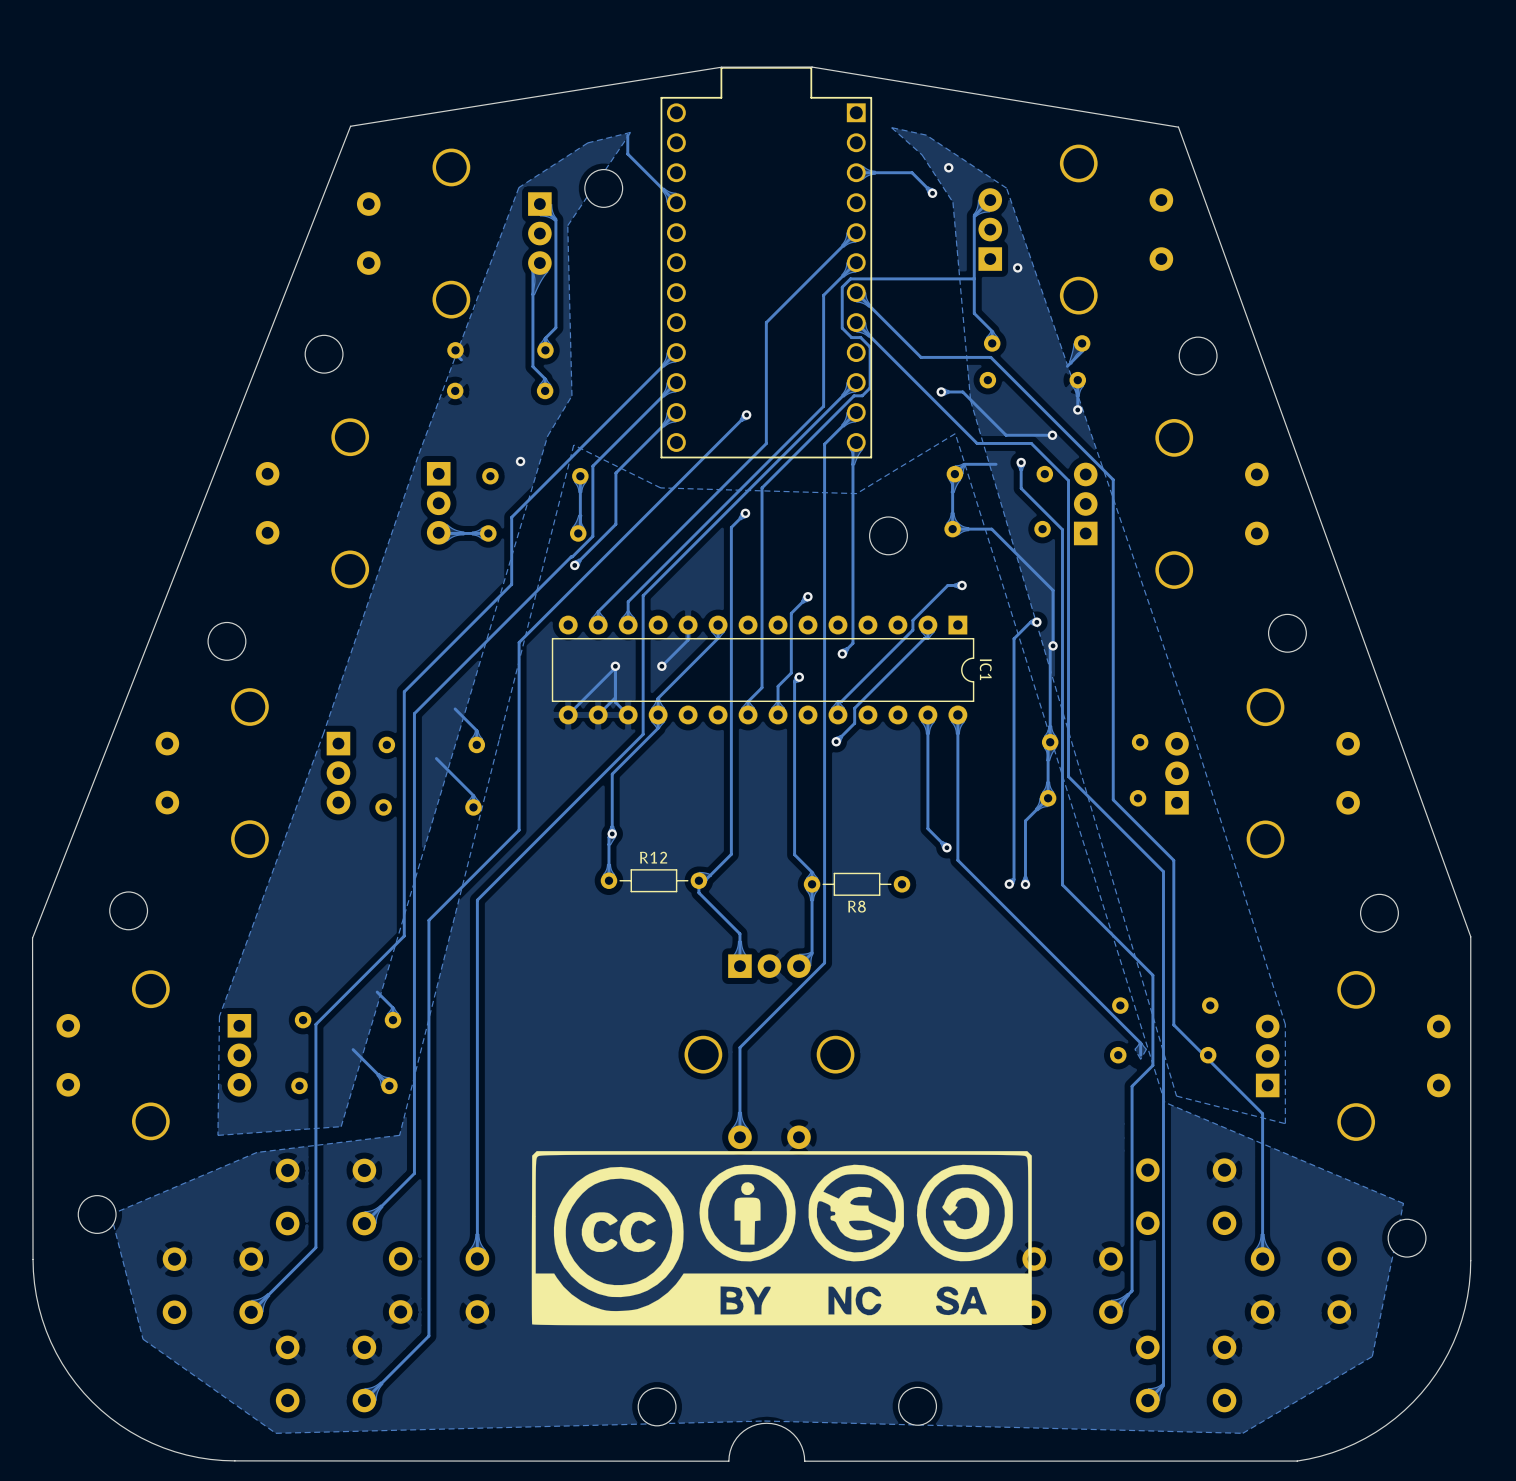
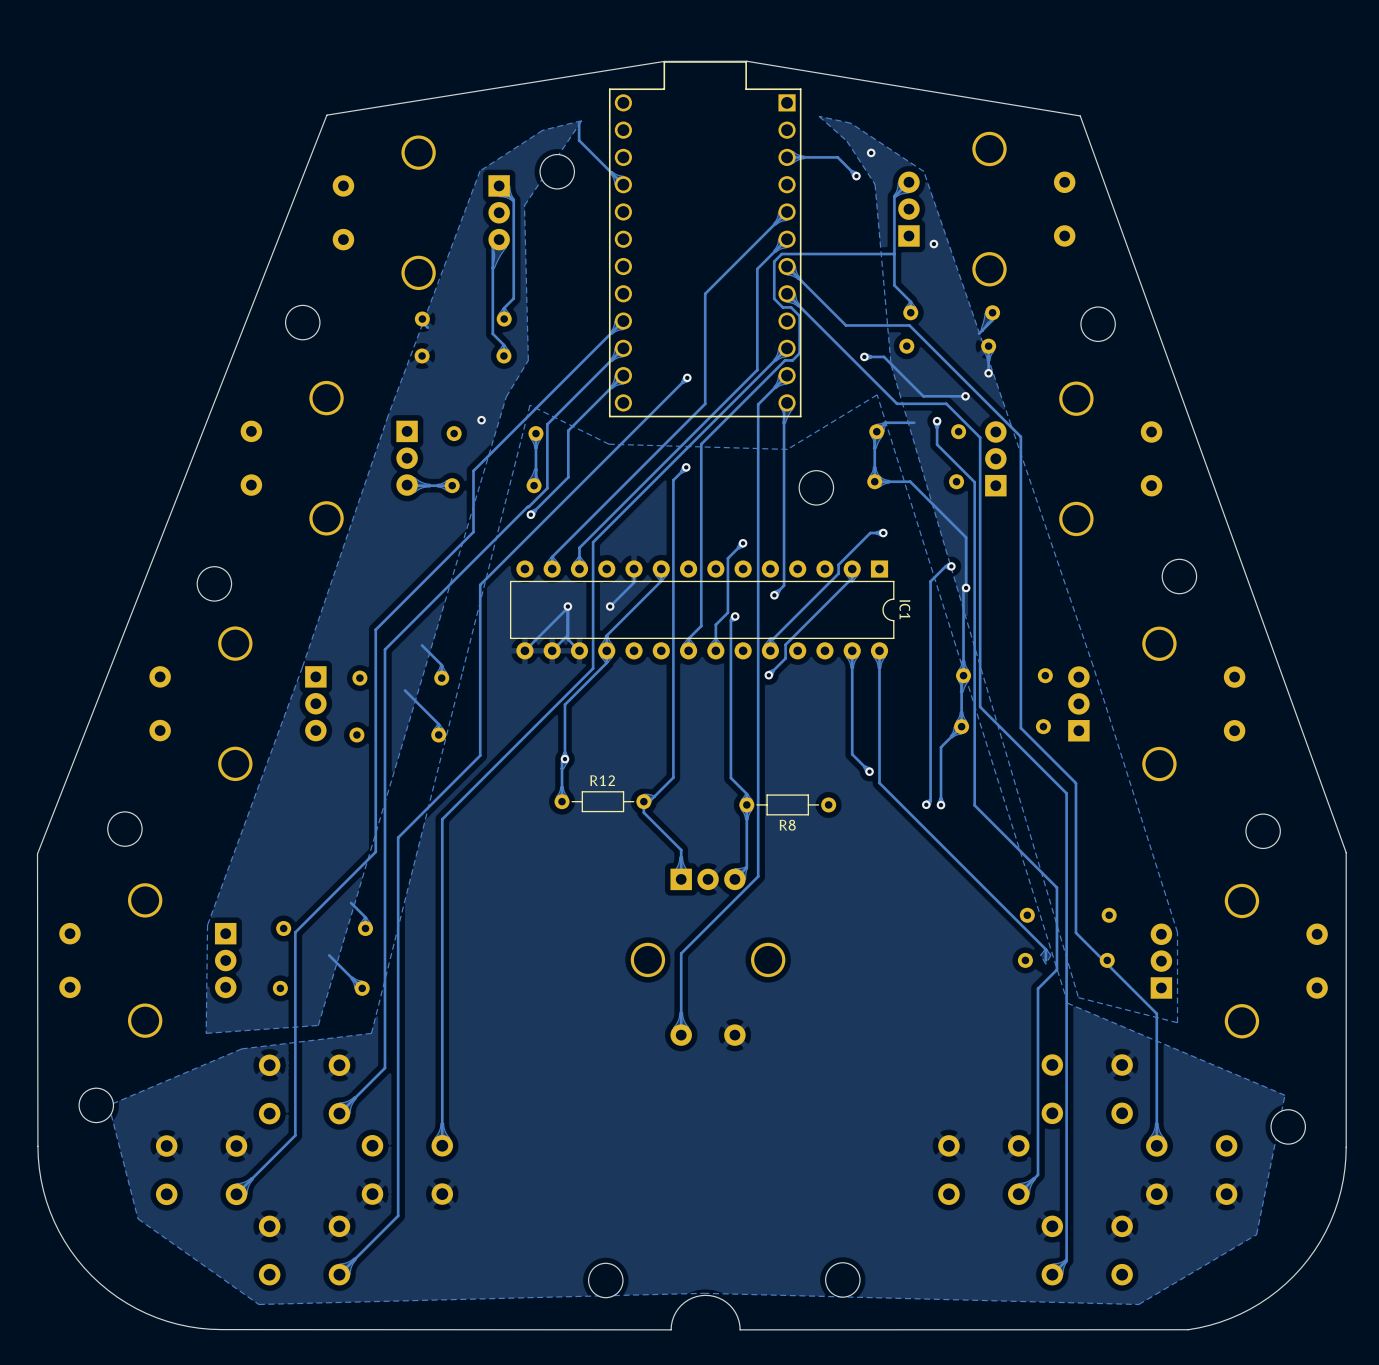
drawing: [531, 1151, 1032, 1326] -> none

